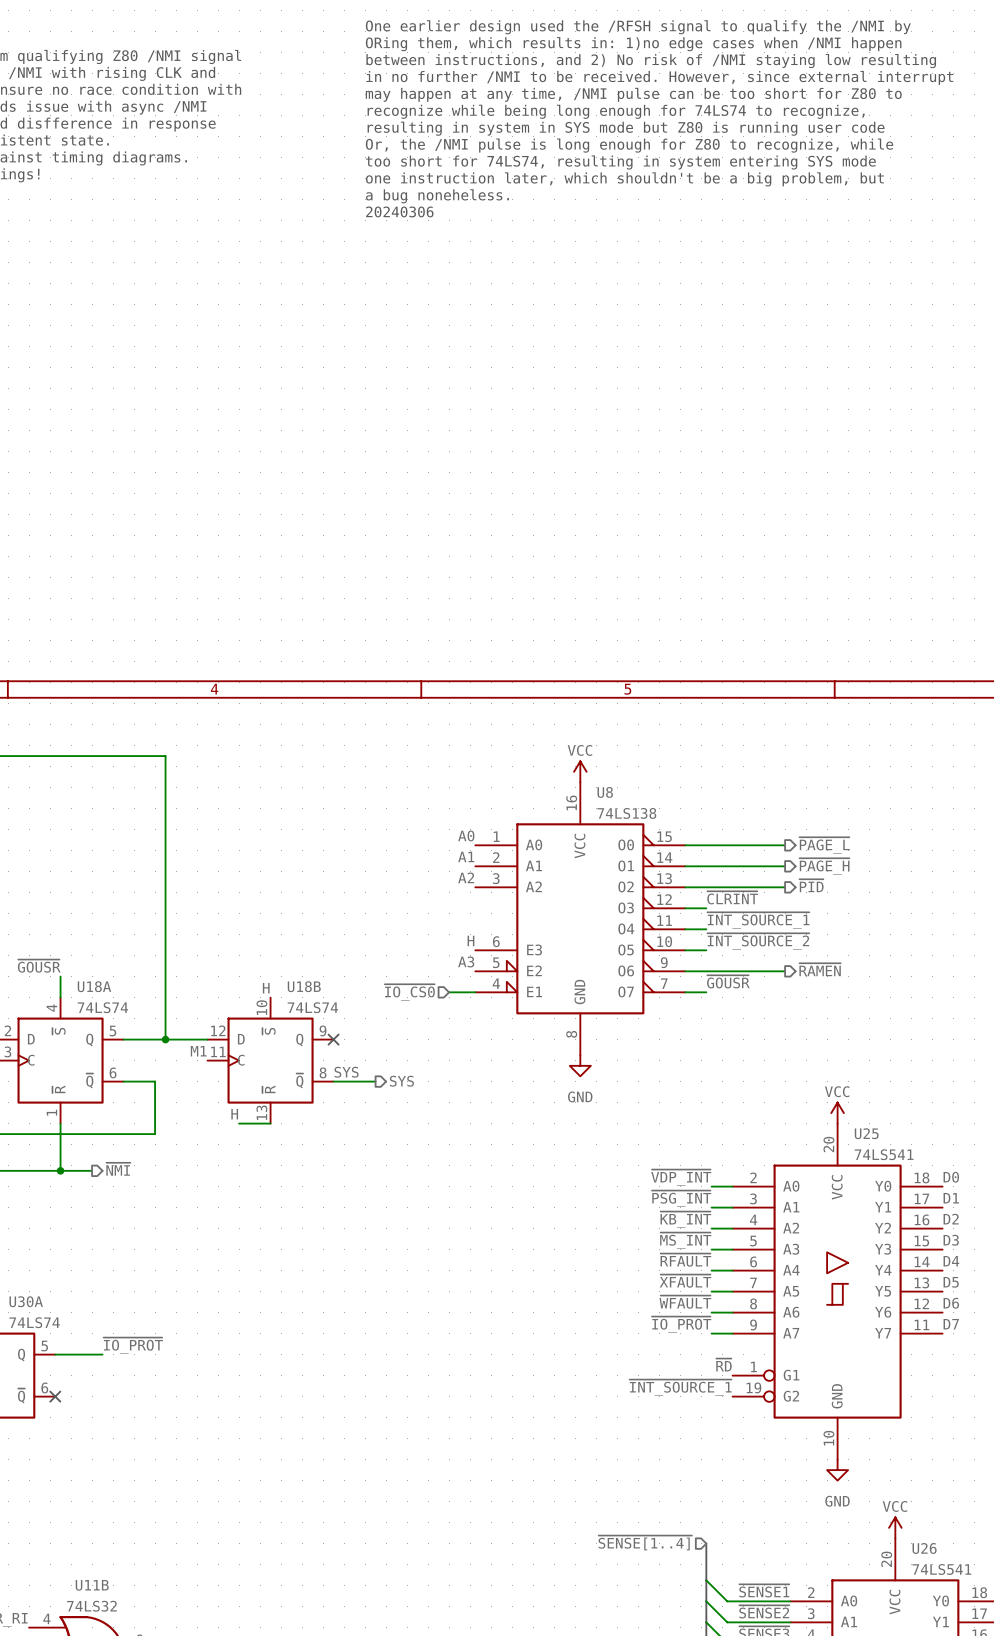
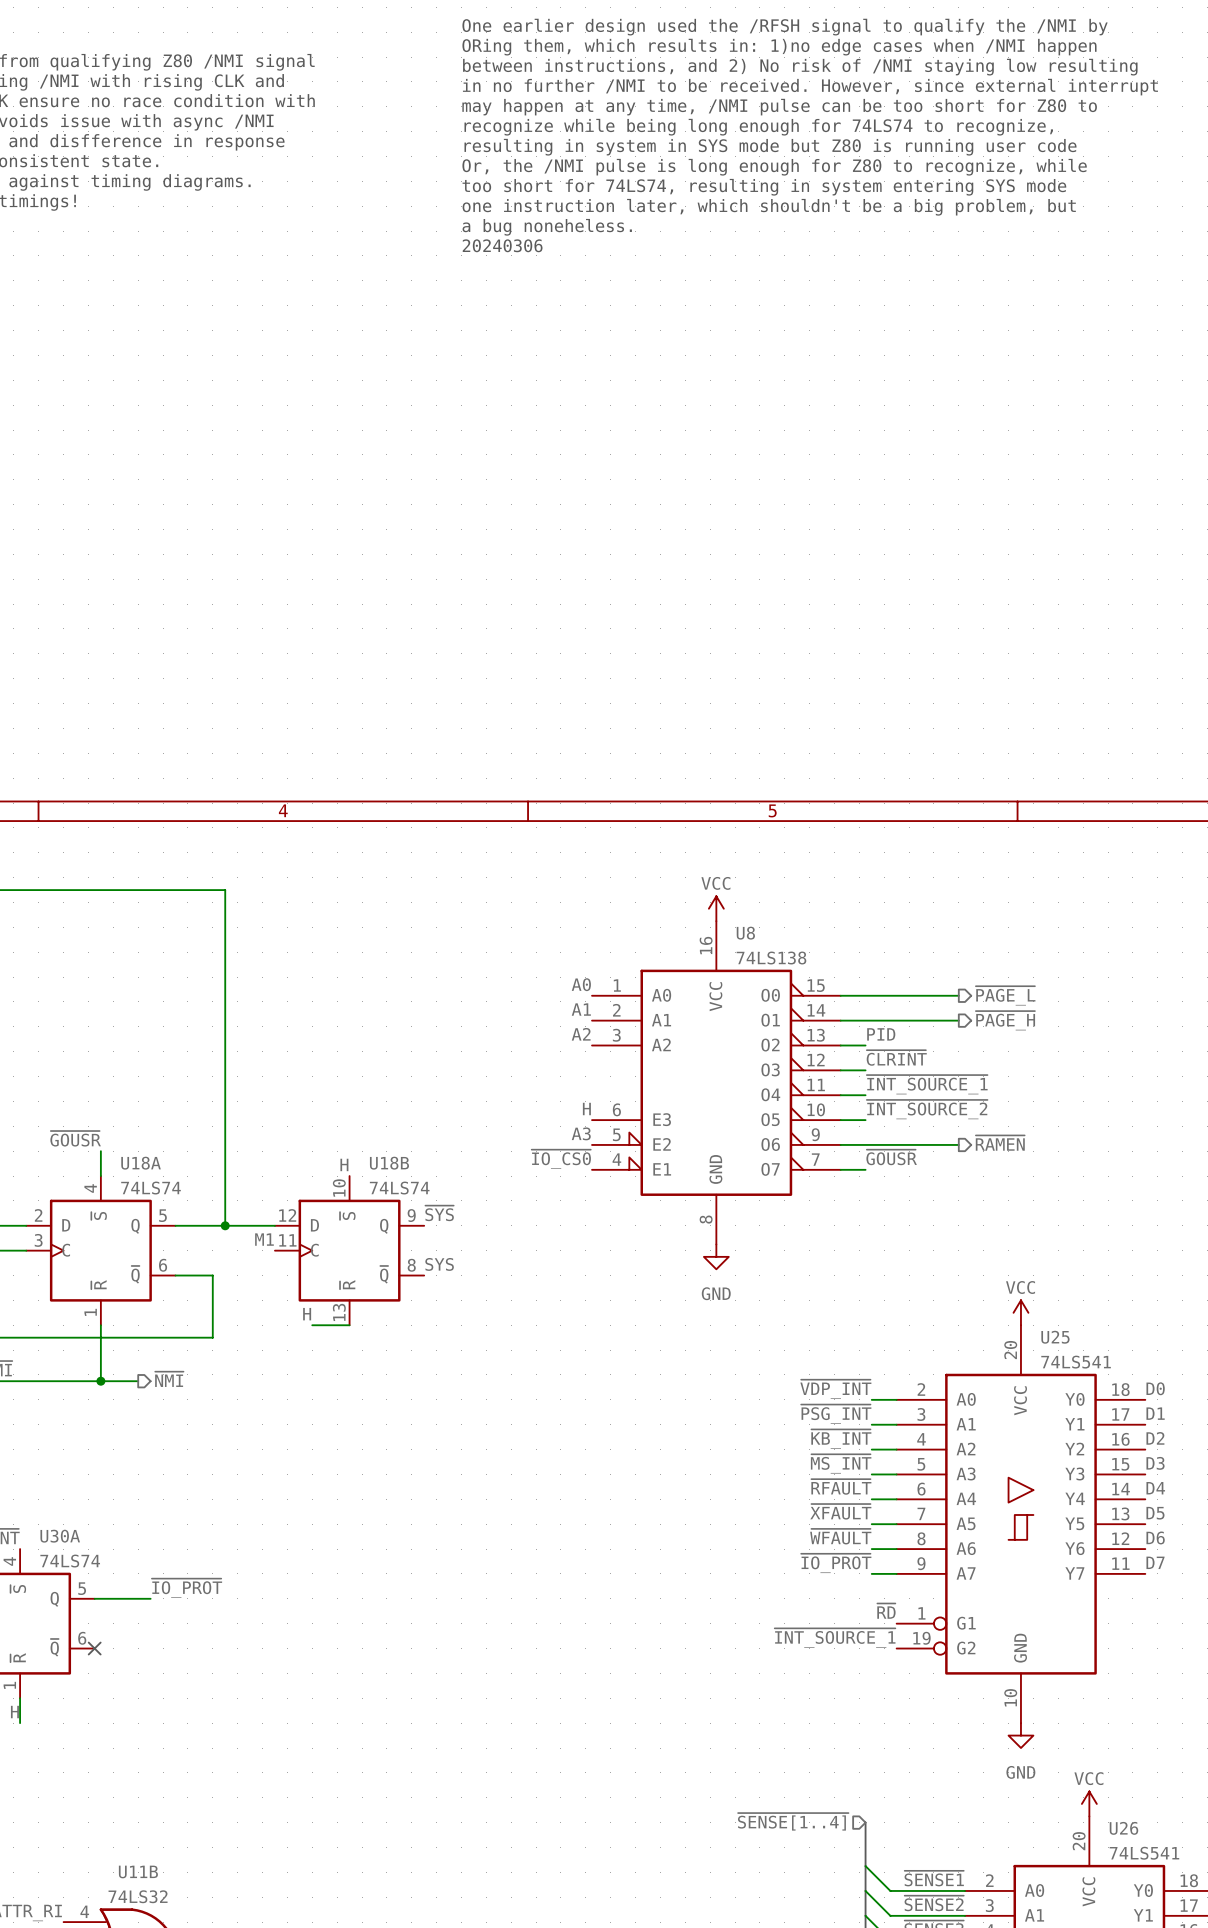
label: none -> PID (881, 1034)
hierarchical label: ~{PID} (811, 885) -> none
wire: (706, 887) (785, 887) -> none
label: none -> ~{IO_CS0} (561, 1159)
hierarchical label: ~{IO_CS0} (409, 992) -> none
wire: (449, 992) (475, 992) -> none
label: none -> ~{SYS} (439, 1213)
no-connect mark: (333, 1039) -> none
wire: (333, 1081) (375, 1081) -> none
hierarchical label: SYS (401, 1081) -> none

